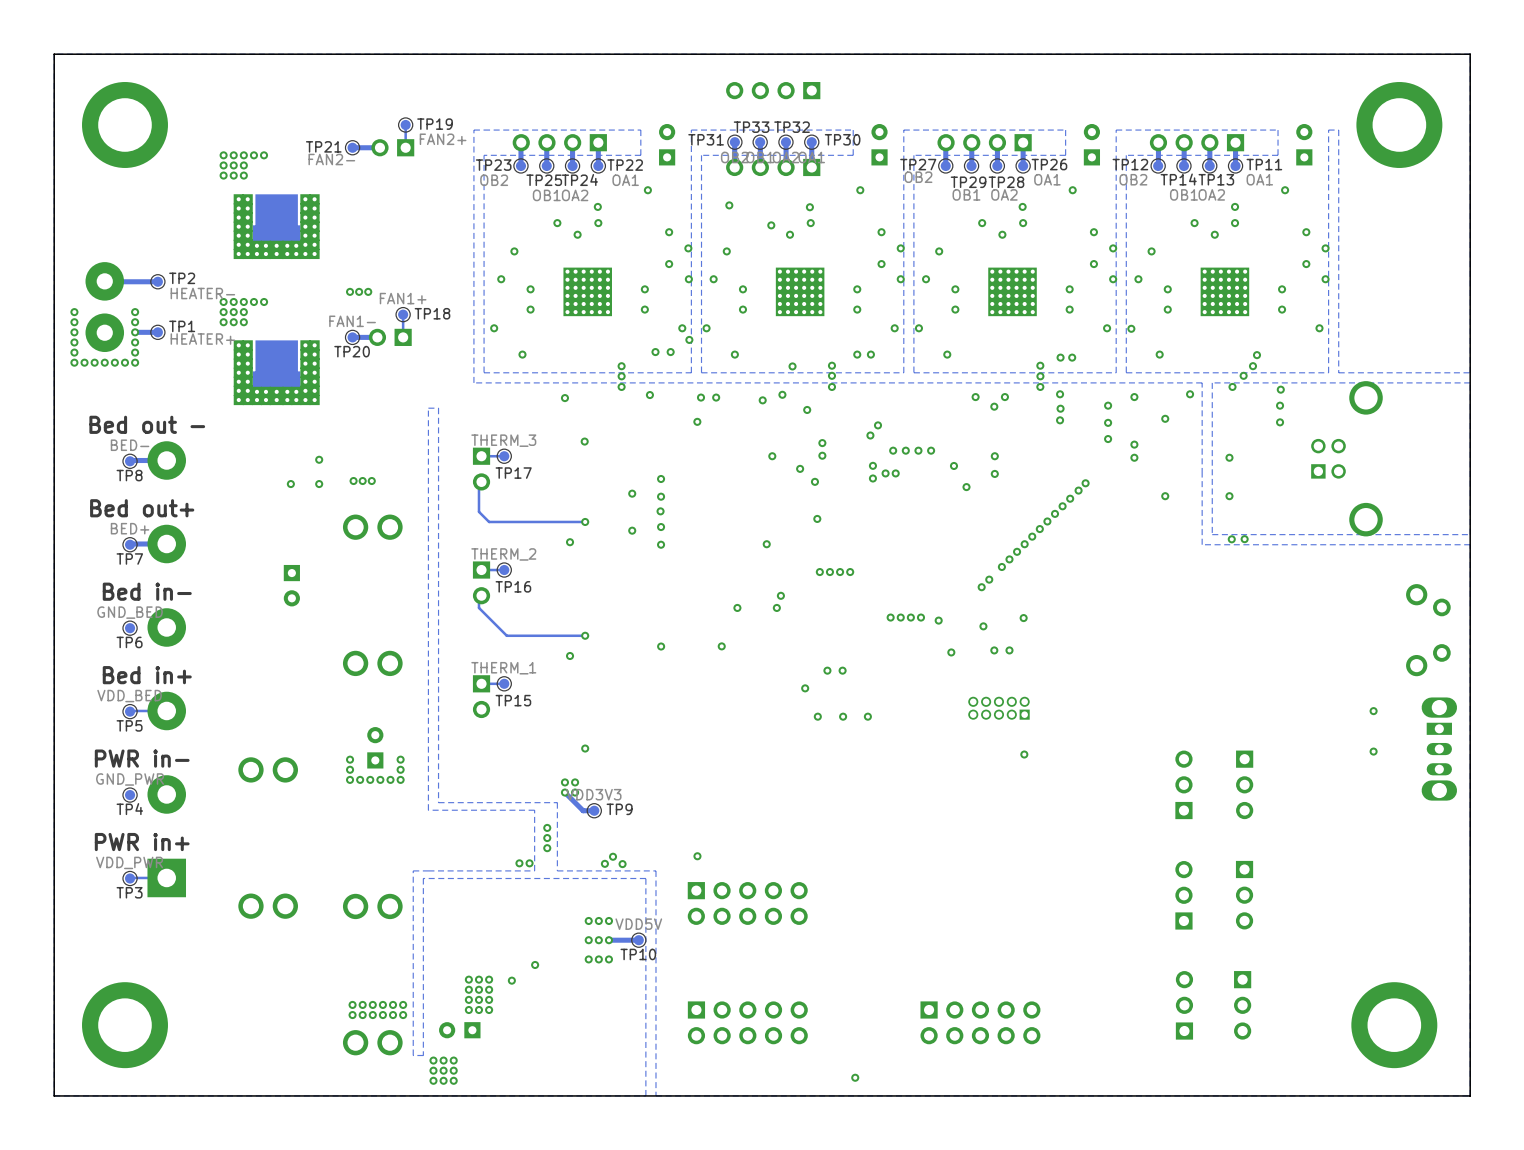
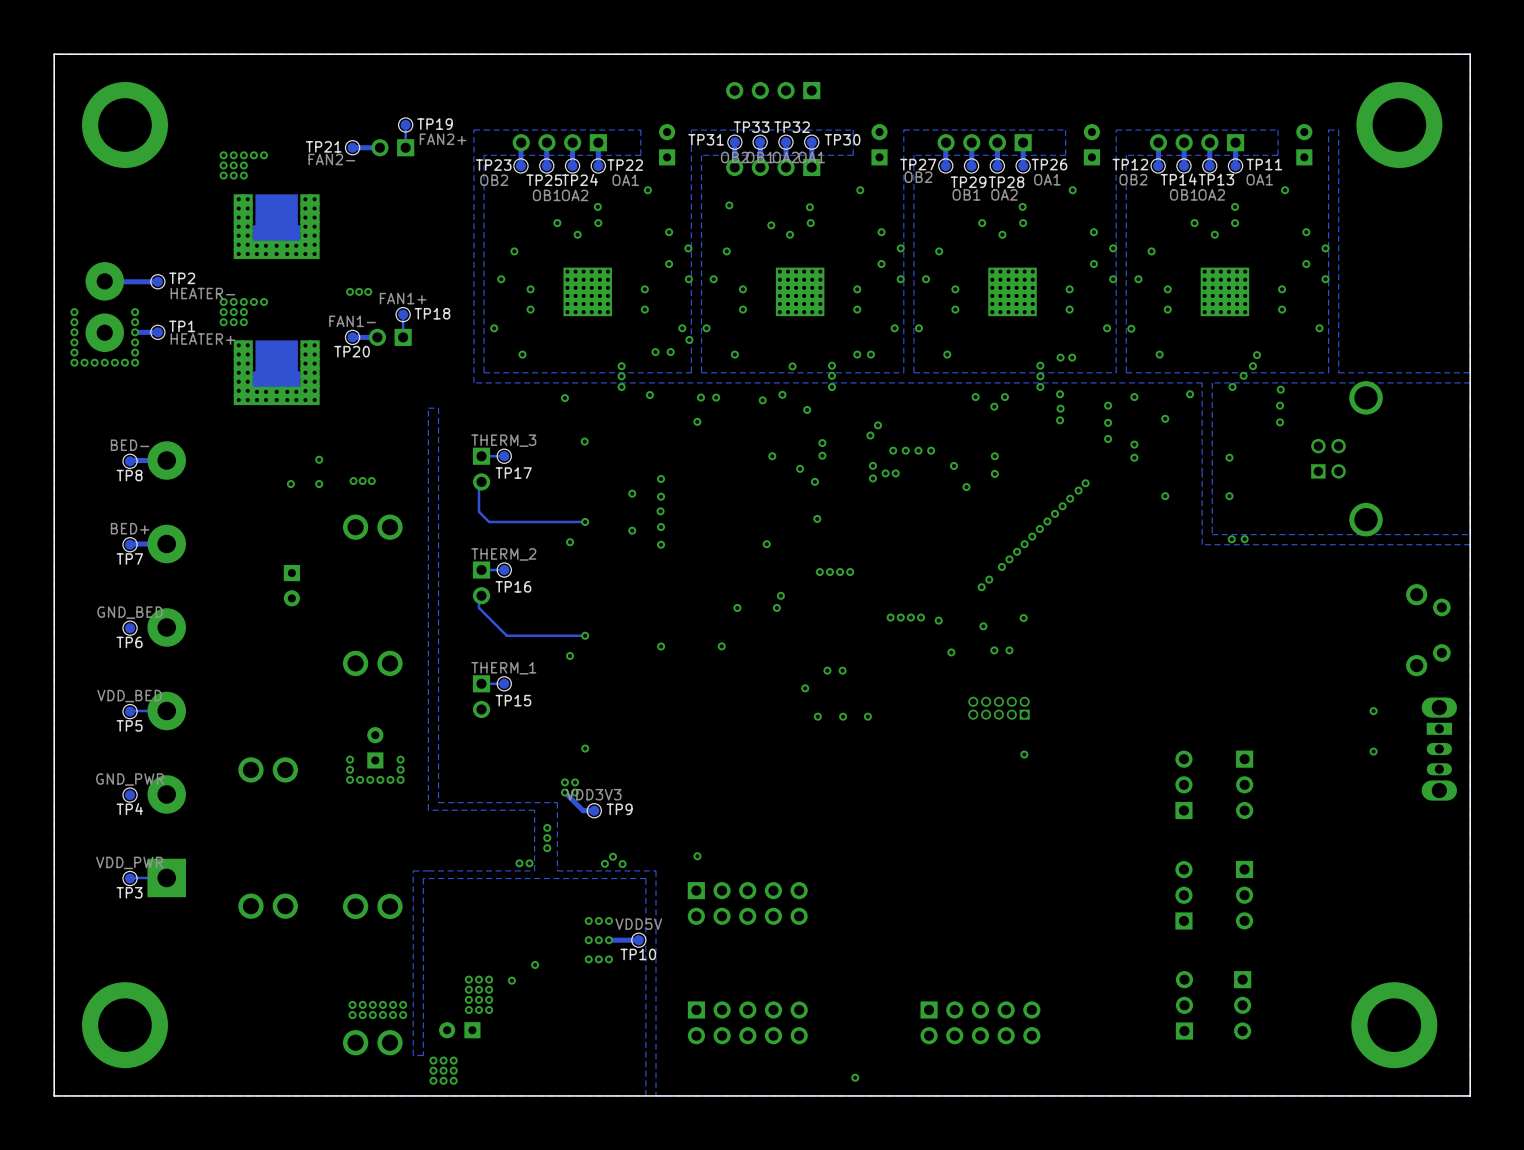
text: Bed out - (147, 424) -> none
text: Bed out+ (142, 508) -> none
text: Bed in- (147, 591) -> none
text: Bed in+ (147, 675) -> none
text: PWR in- (142, 758) -> none
text: PWR in+ (142, 842) -> none

